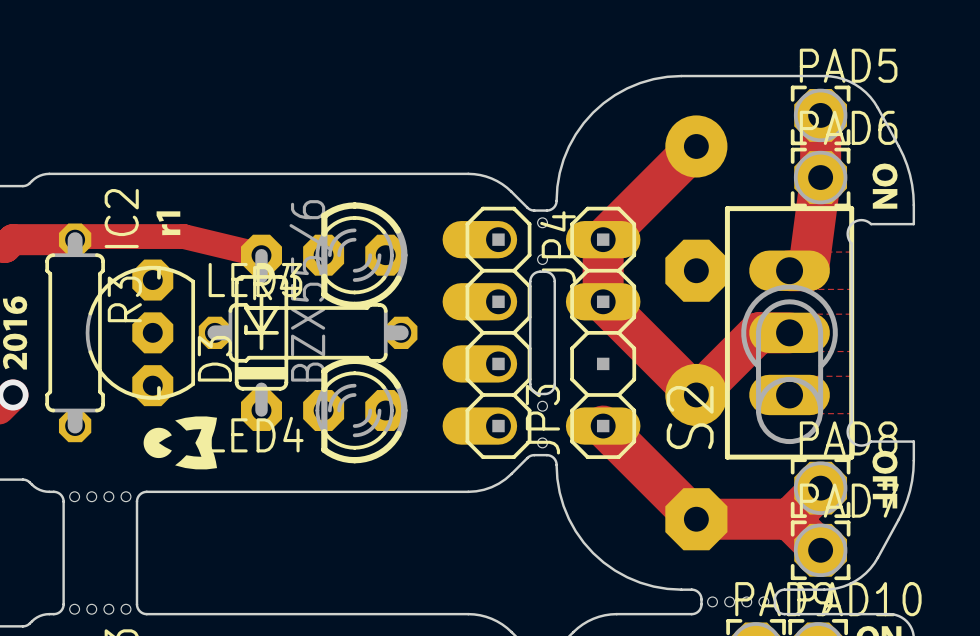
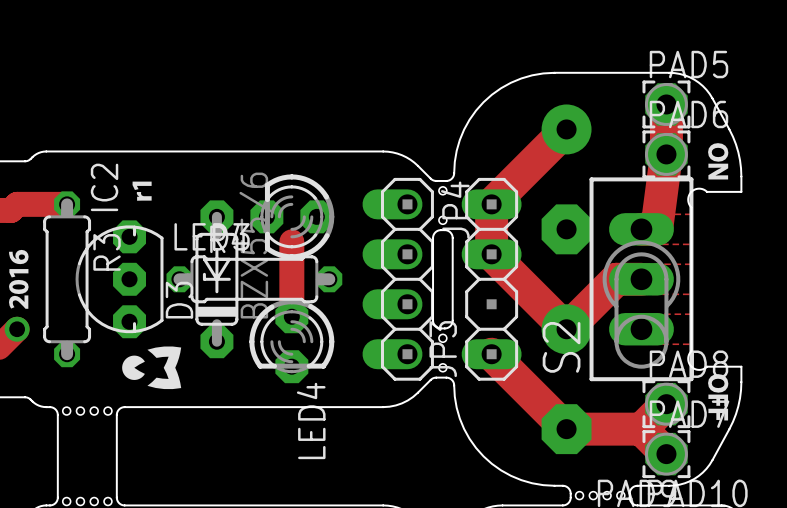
track: (75, 239) (75, 236) (183, 236) (261, 255) -> none
track: none -> (291, 241) (291, 316)
LED4 rotation: 0° (355, 410) -> 90° counterclockwise (291, 341)

